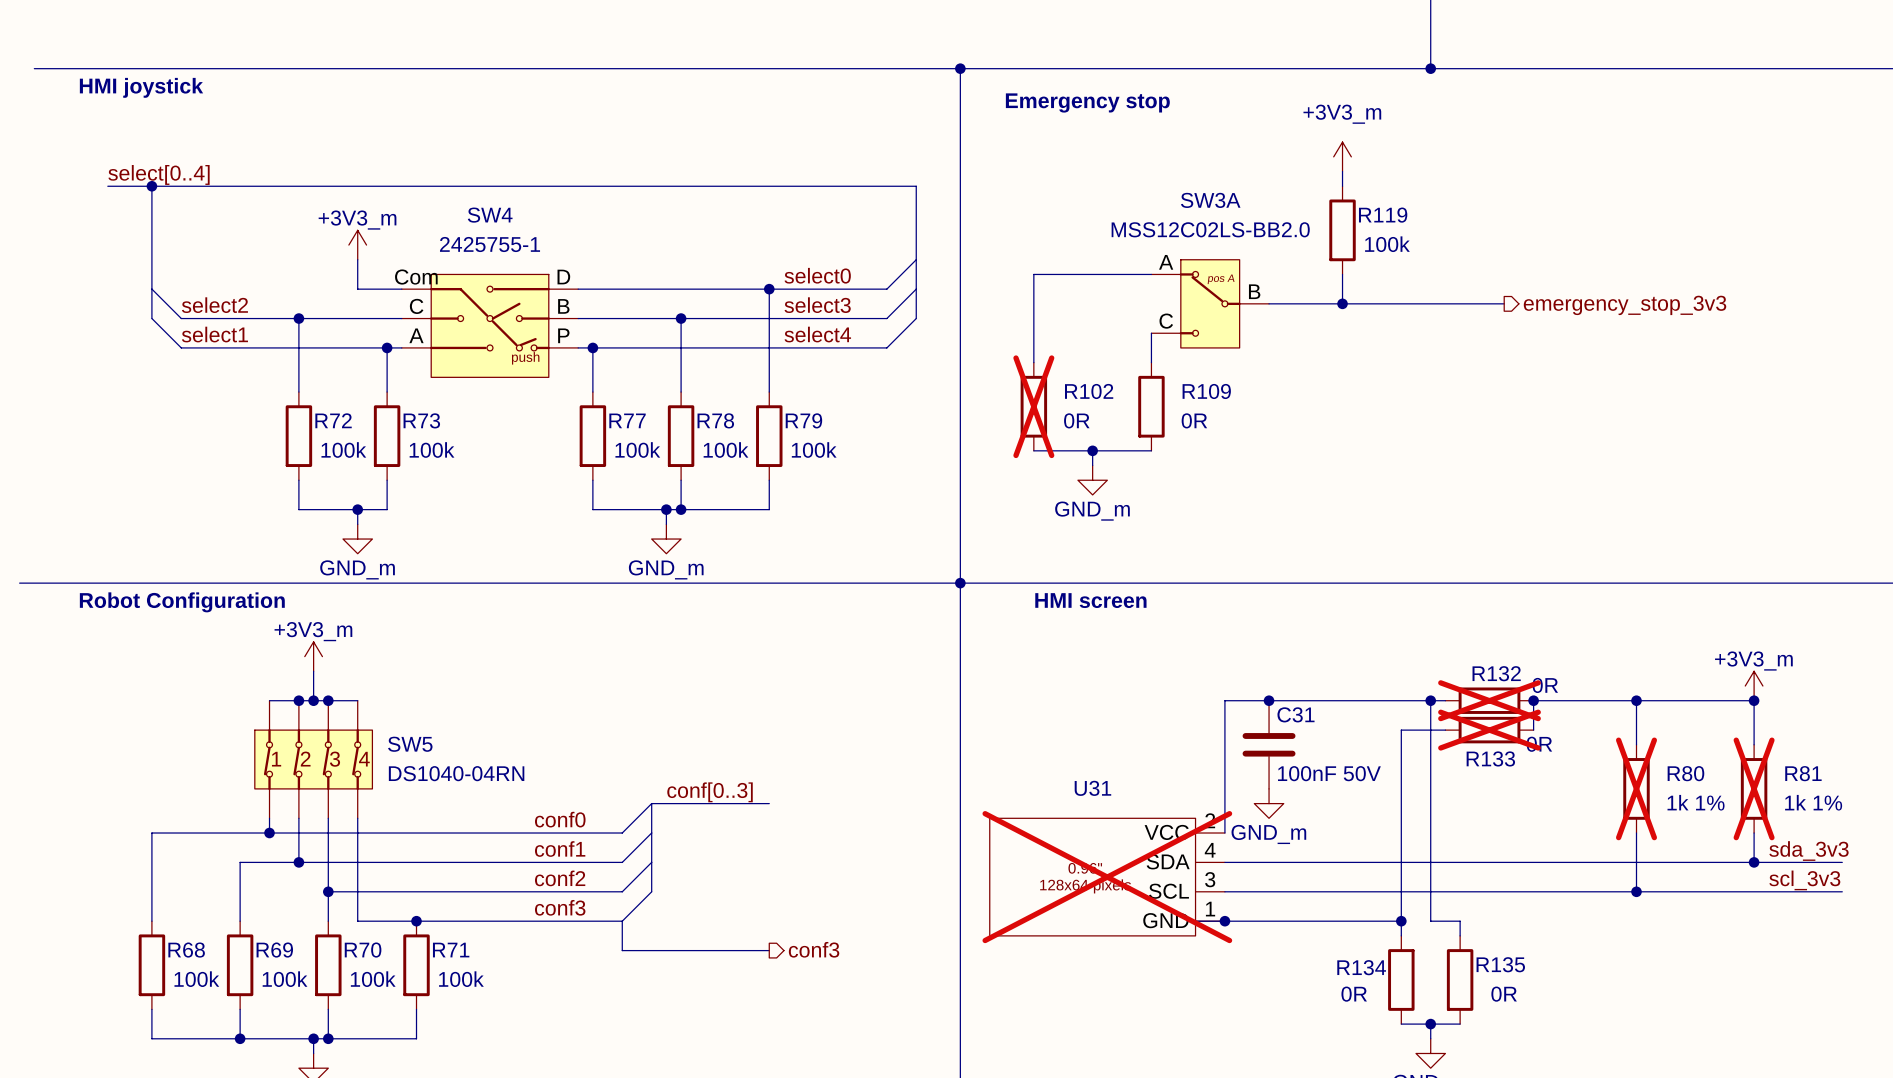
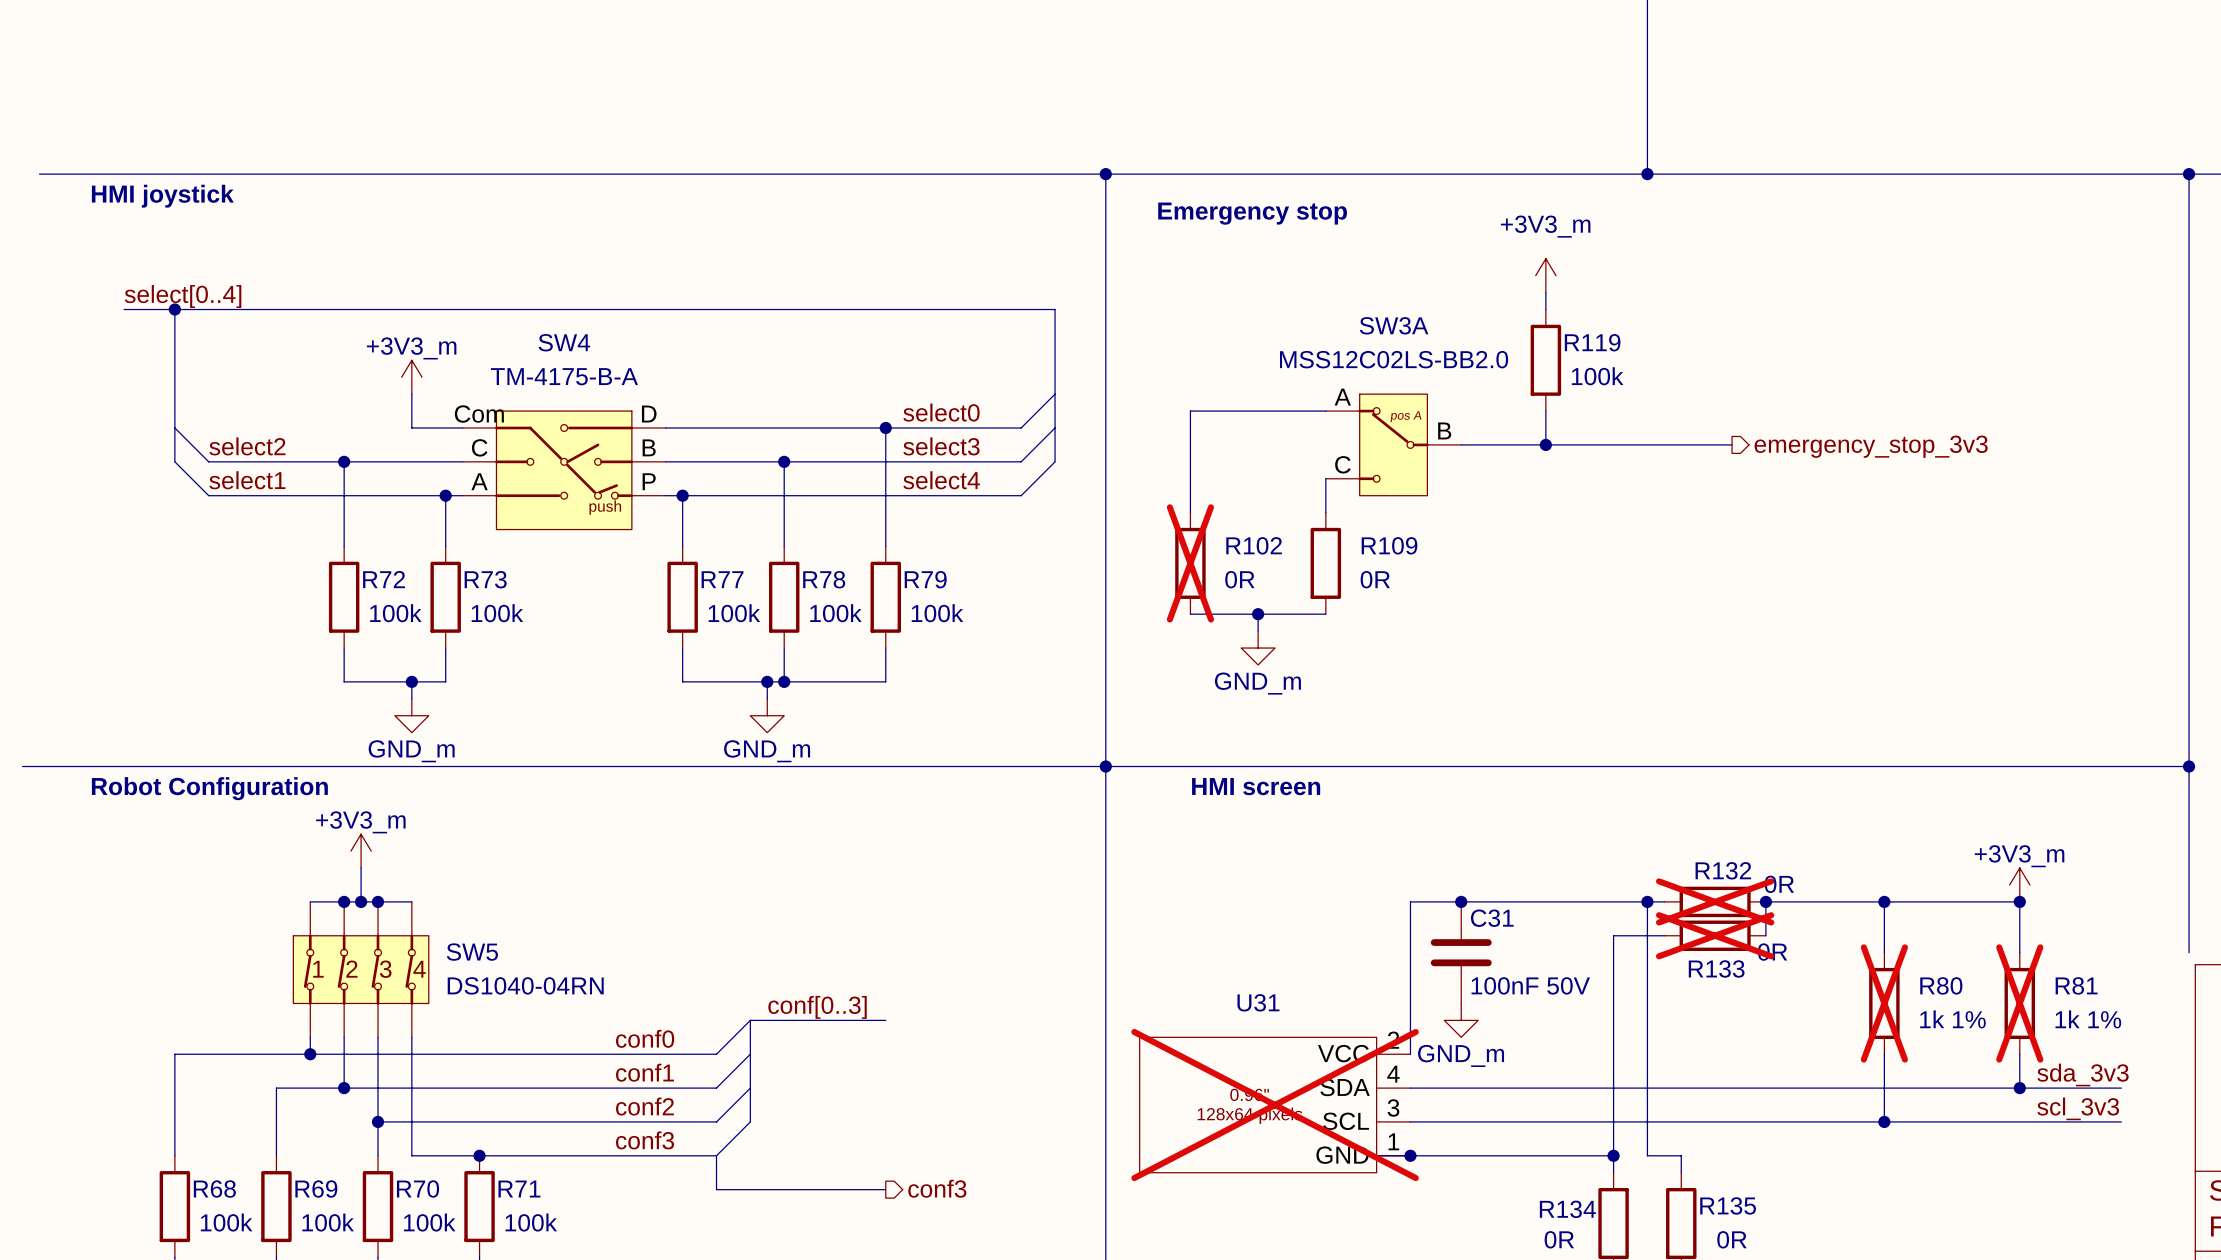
SW4 value: 2425755-1 (490, 244) -> TM-4175-B-A (564, 376)

